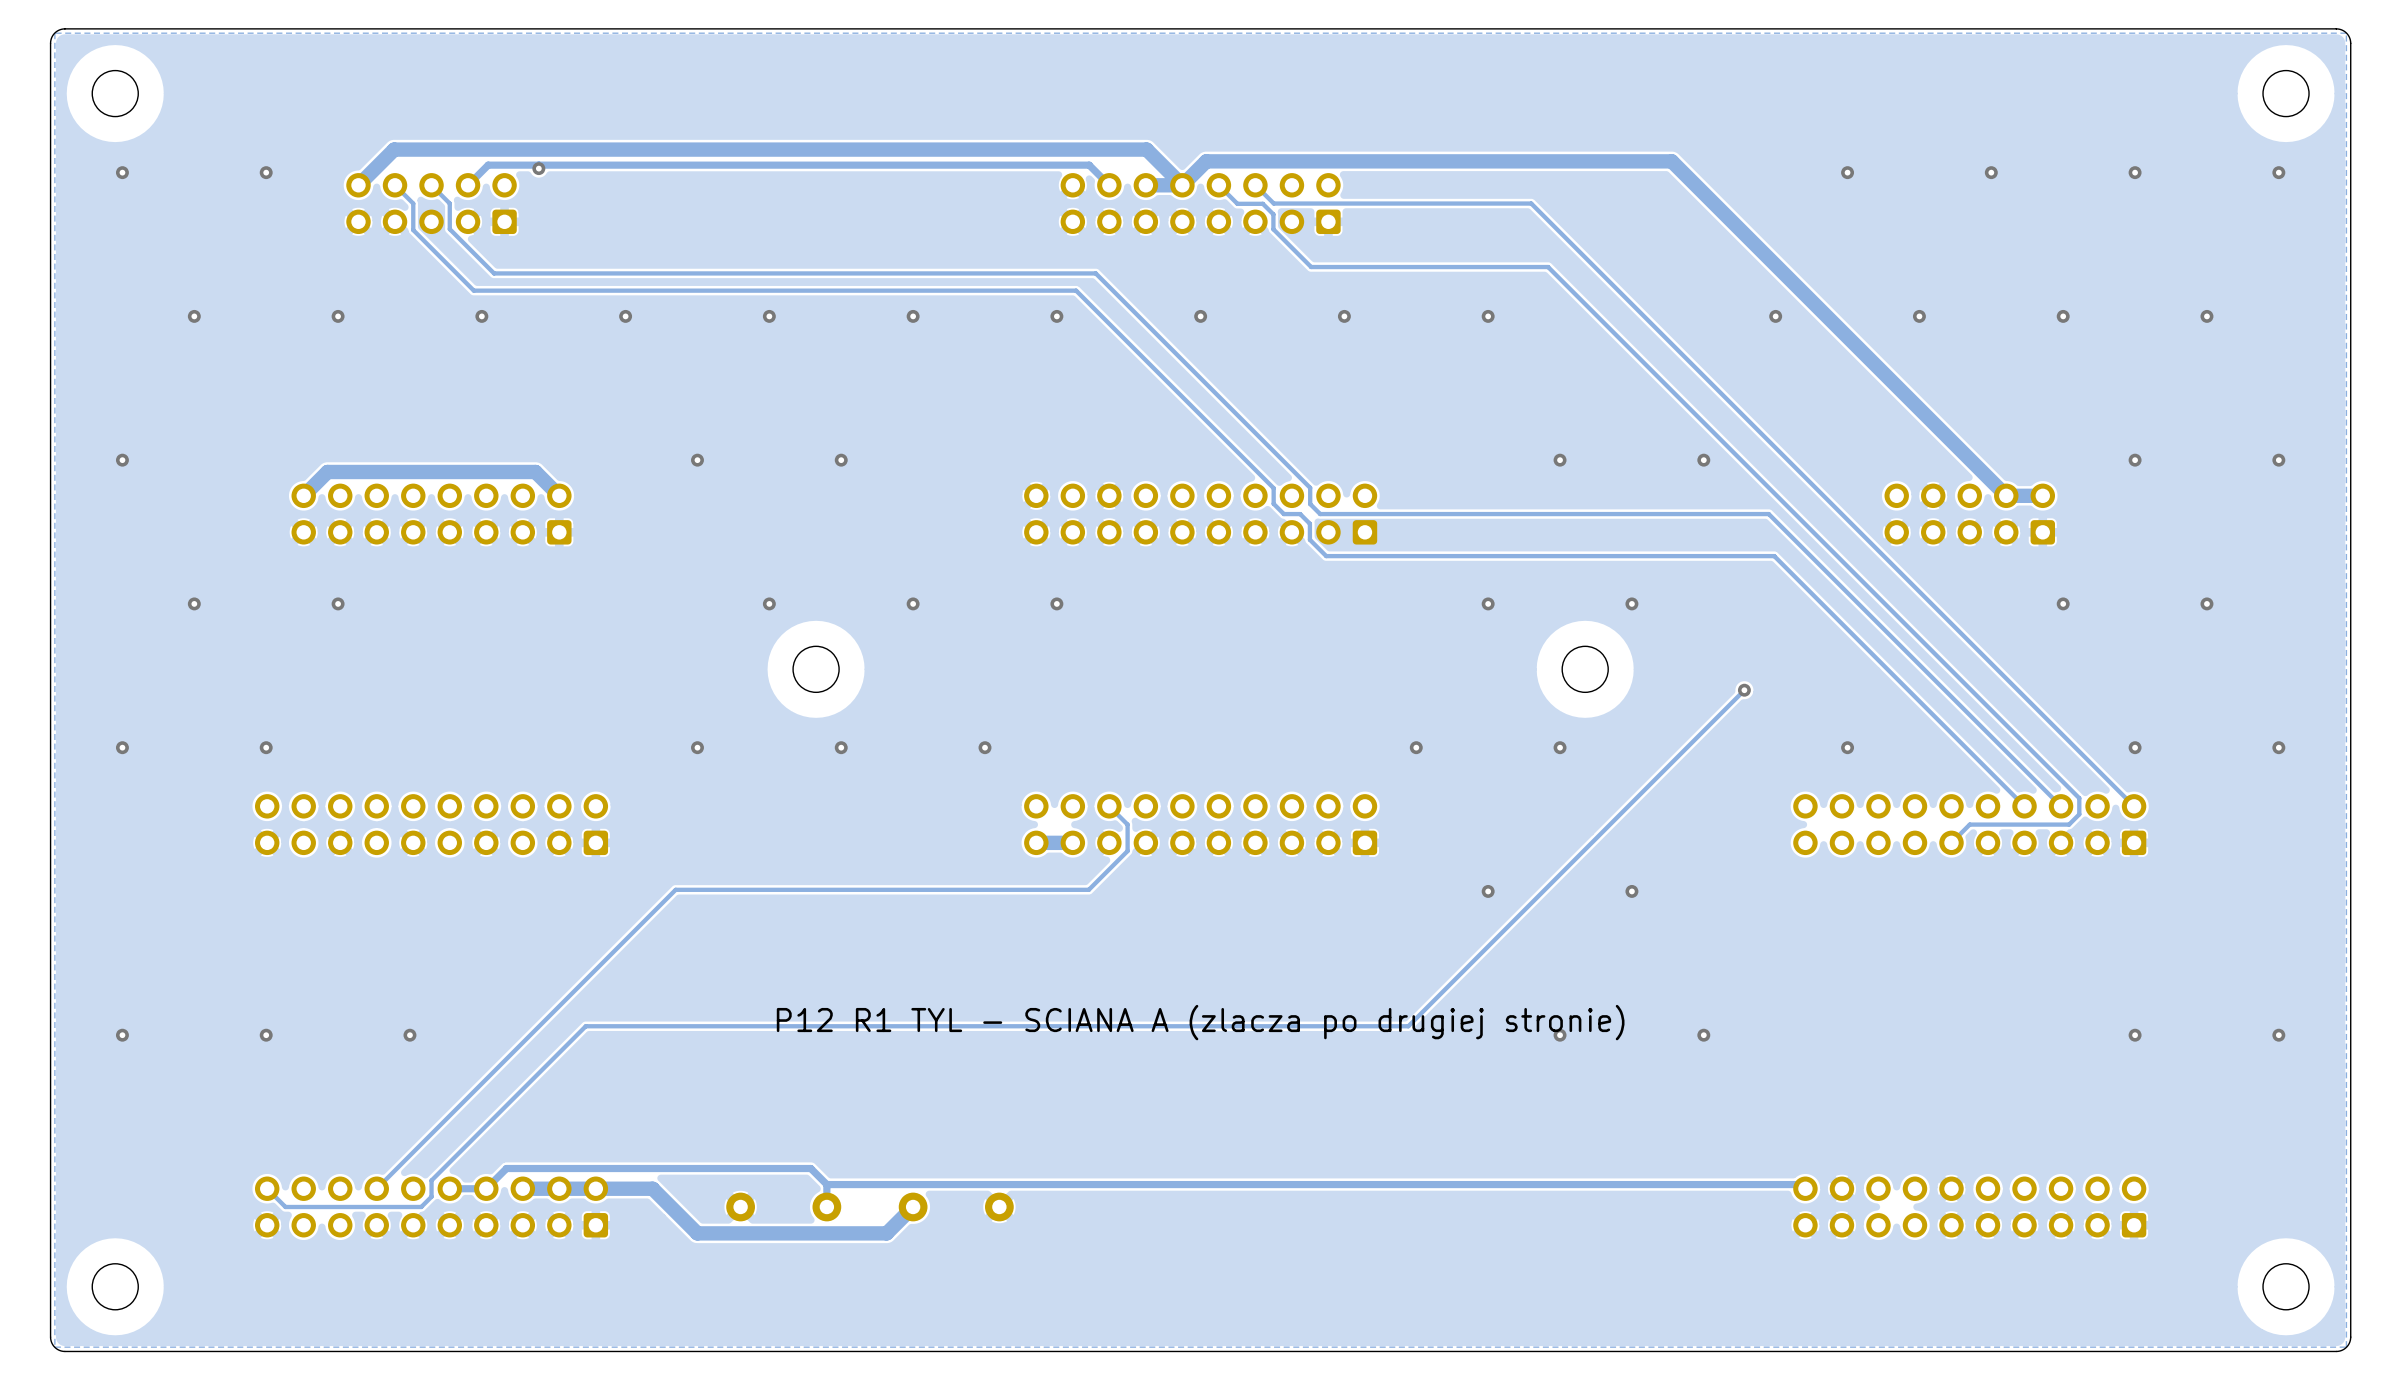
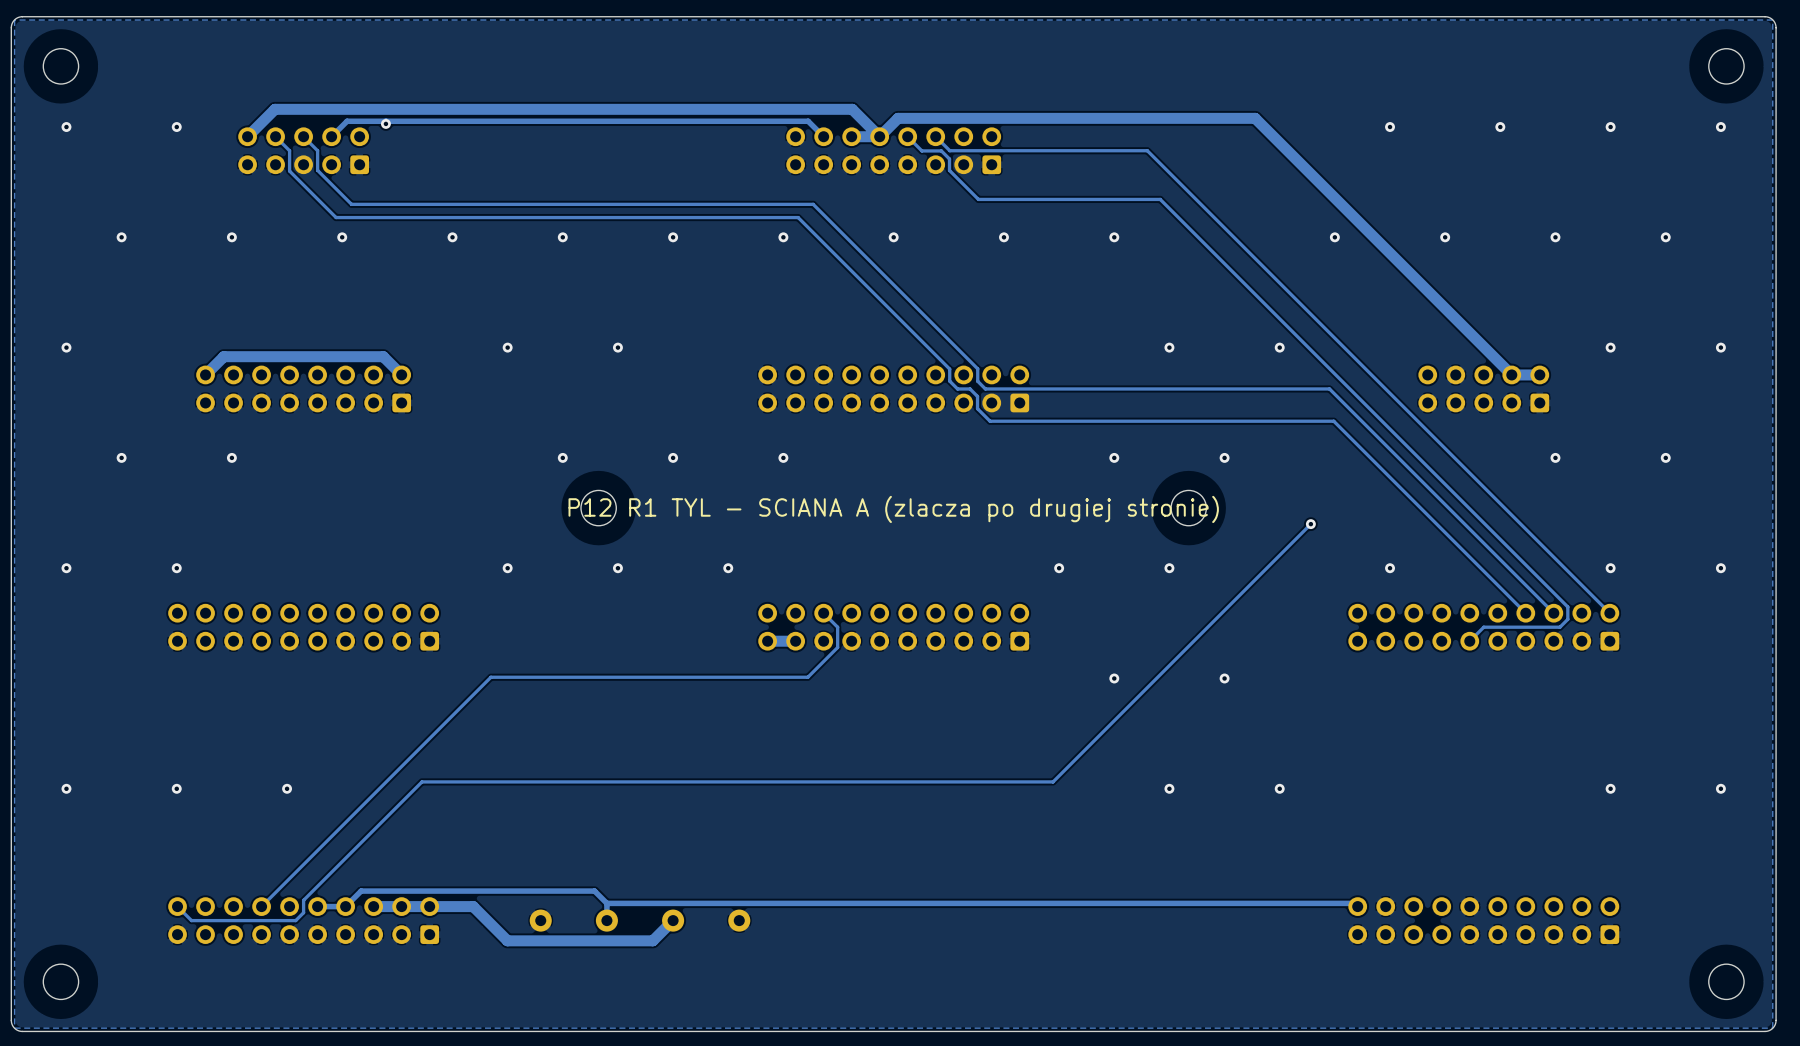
text position: P12 R1 TYL - SCIANA A (zlacza po drugiej stronie) (1200, 1022) -> P12 R1 TYL - SCIANA A (zlacza po drugiej stronie) (893, 509)

